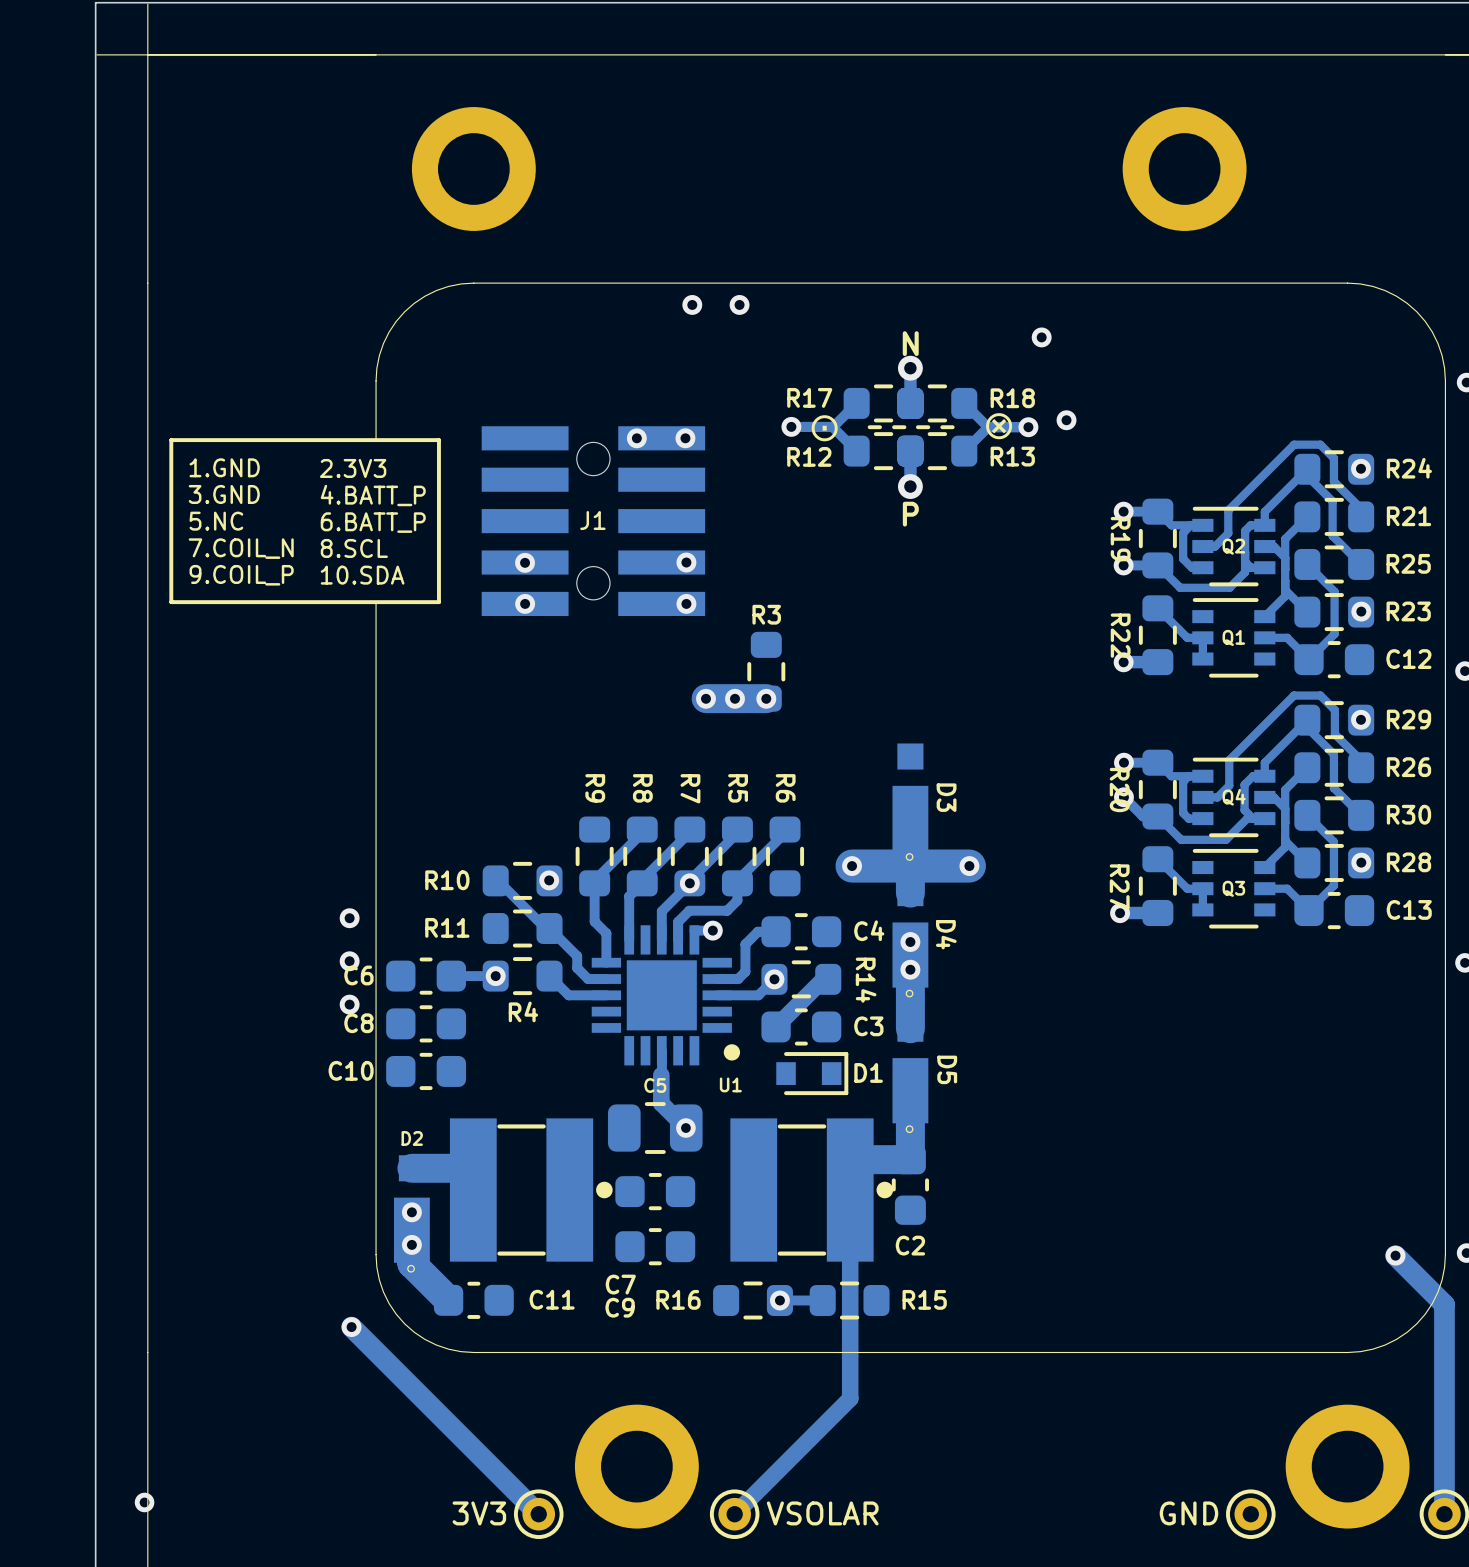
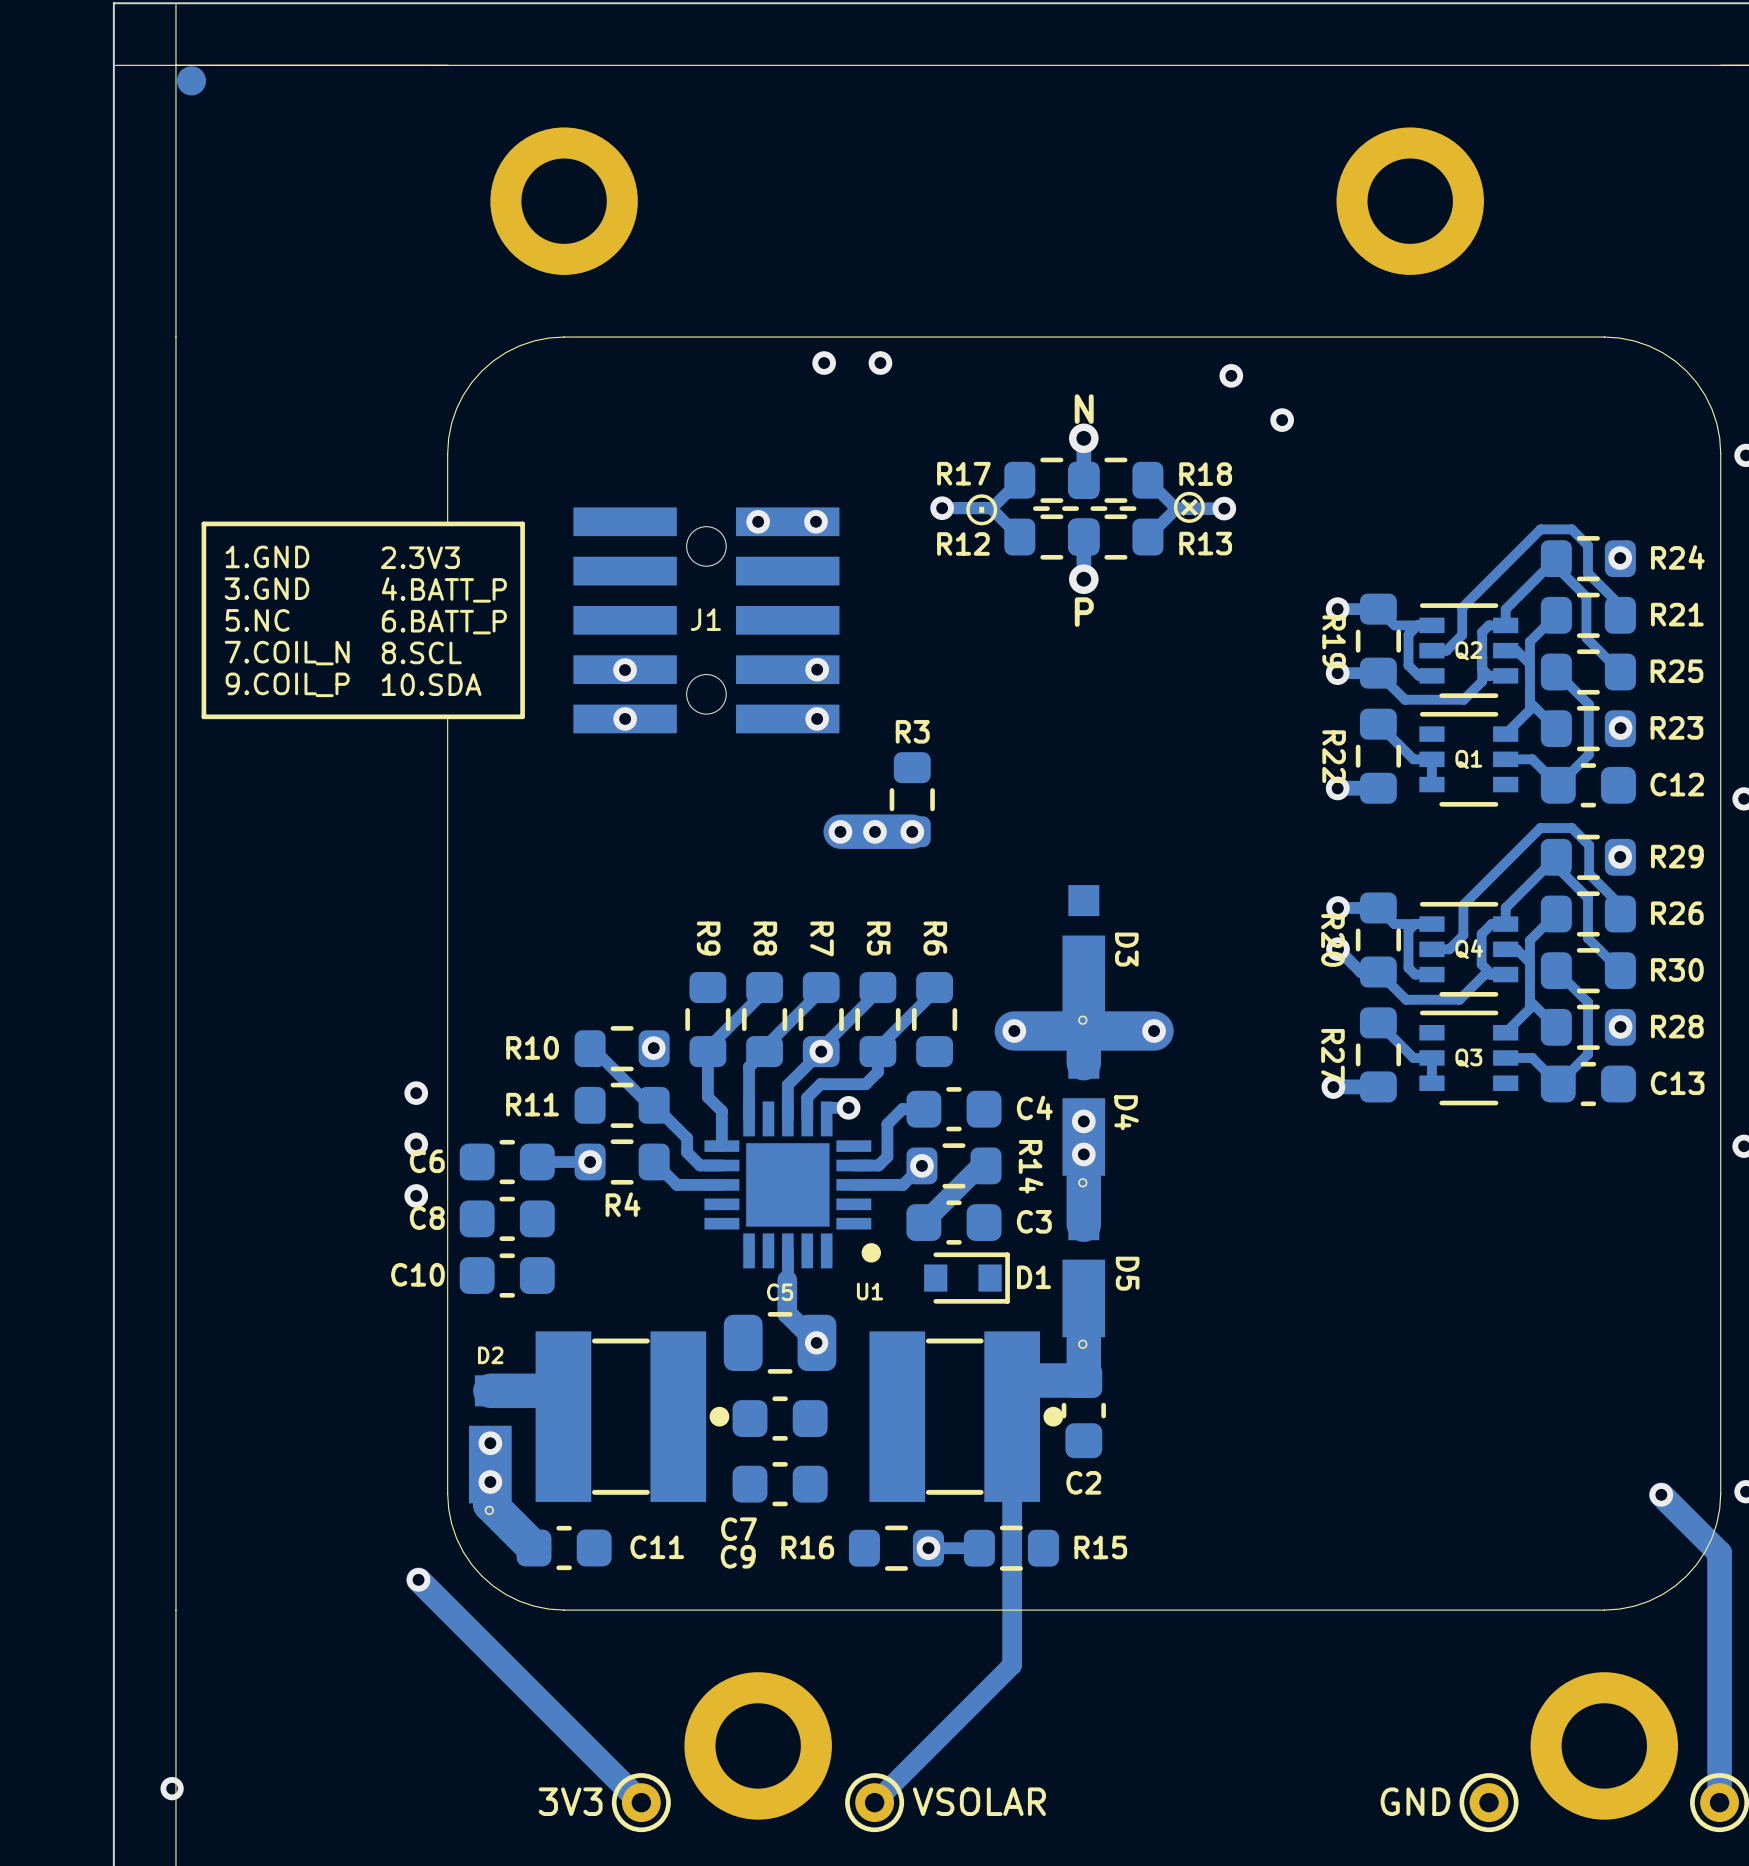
part: none -> (191, 80)
via: none -> (1231, 375)
via: (1041, 337) -> none
via: none -> (1282, 420)
via: (1066, 420) -> none

